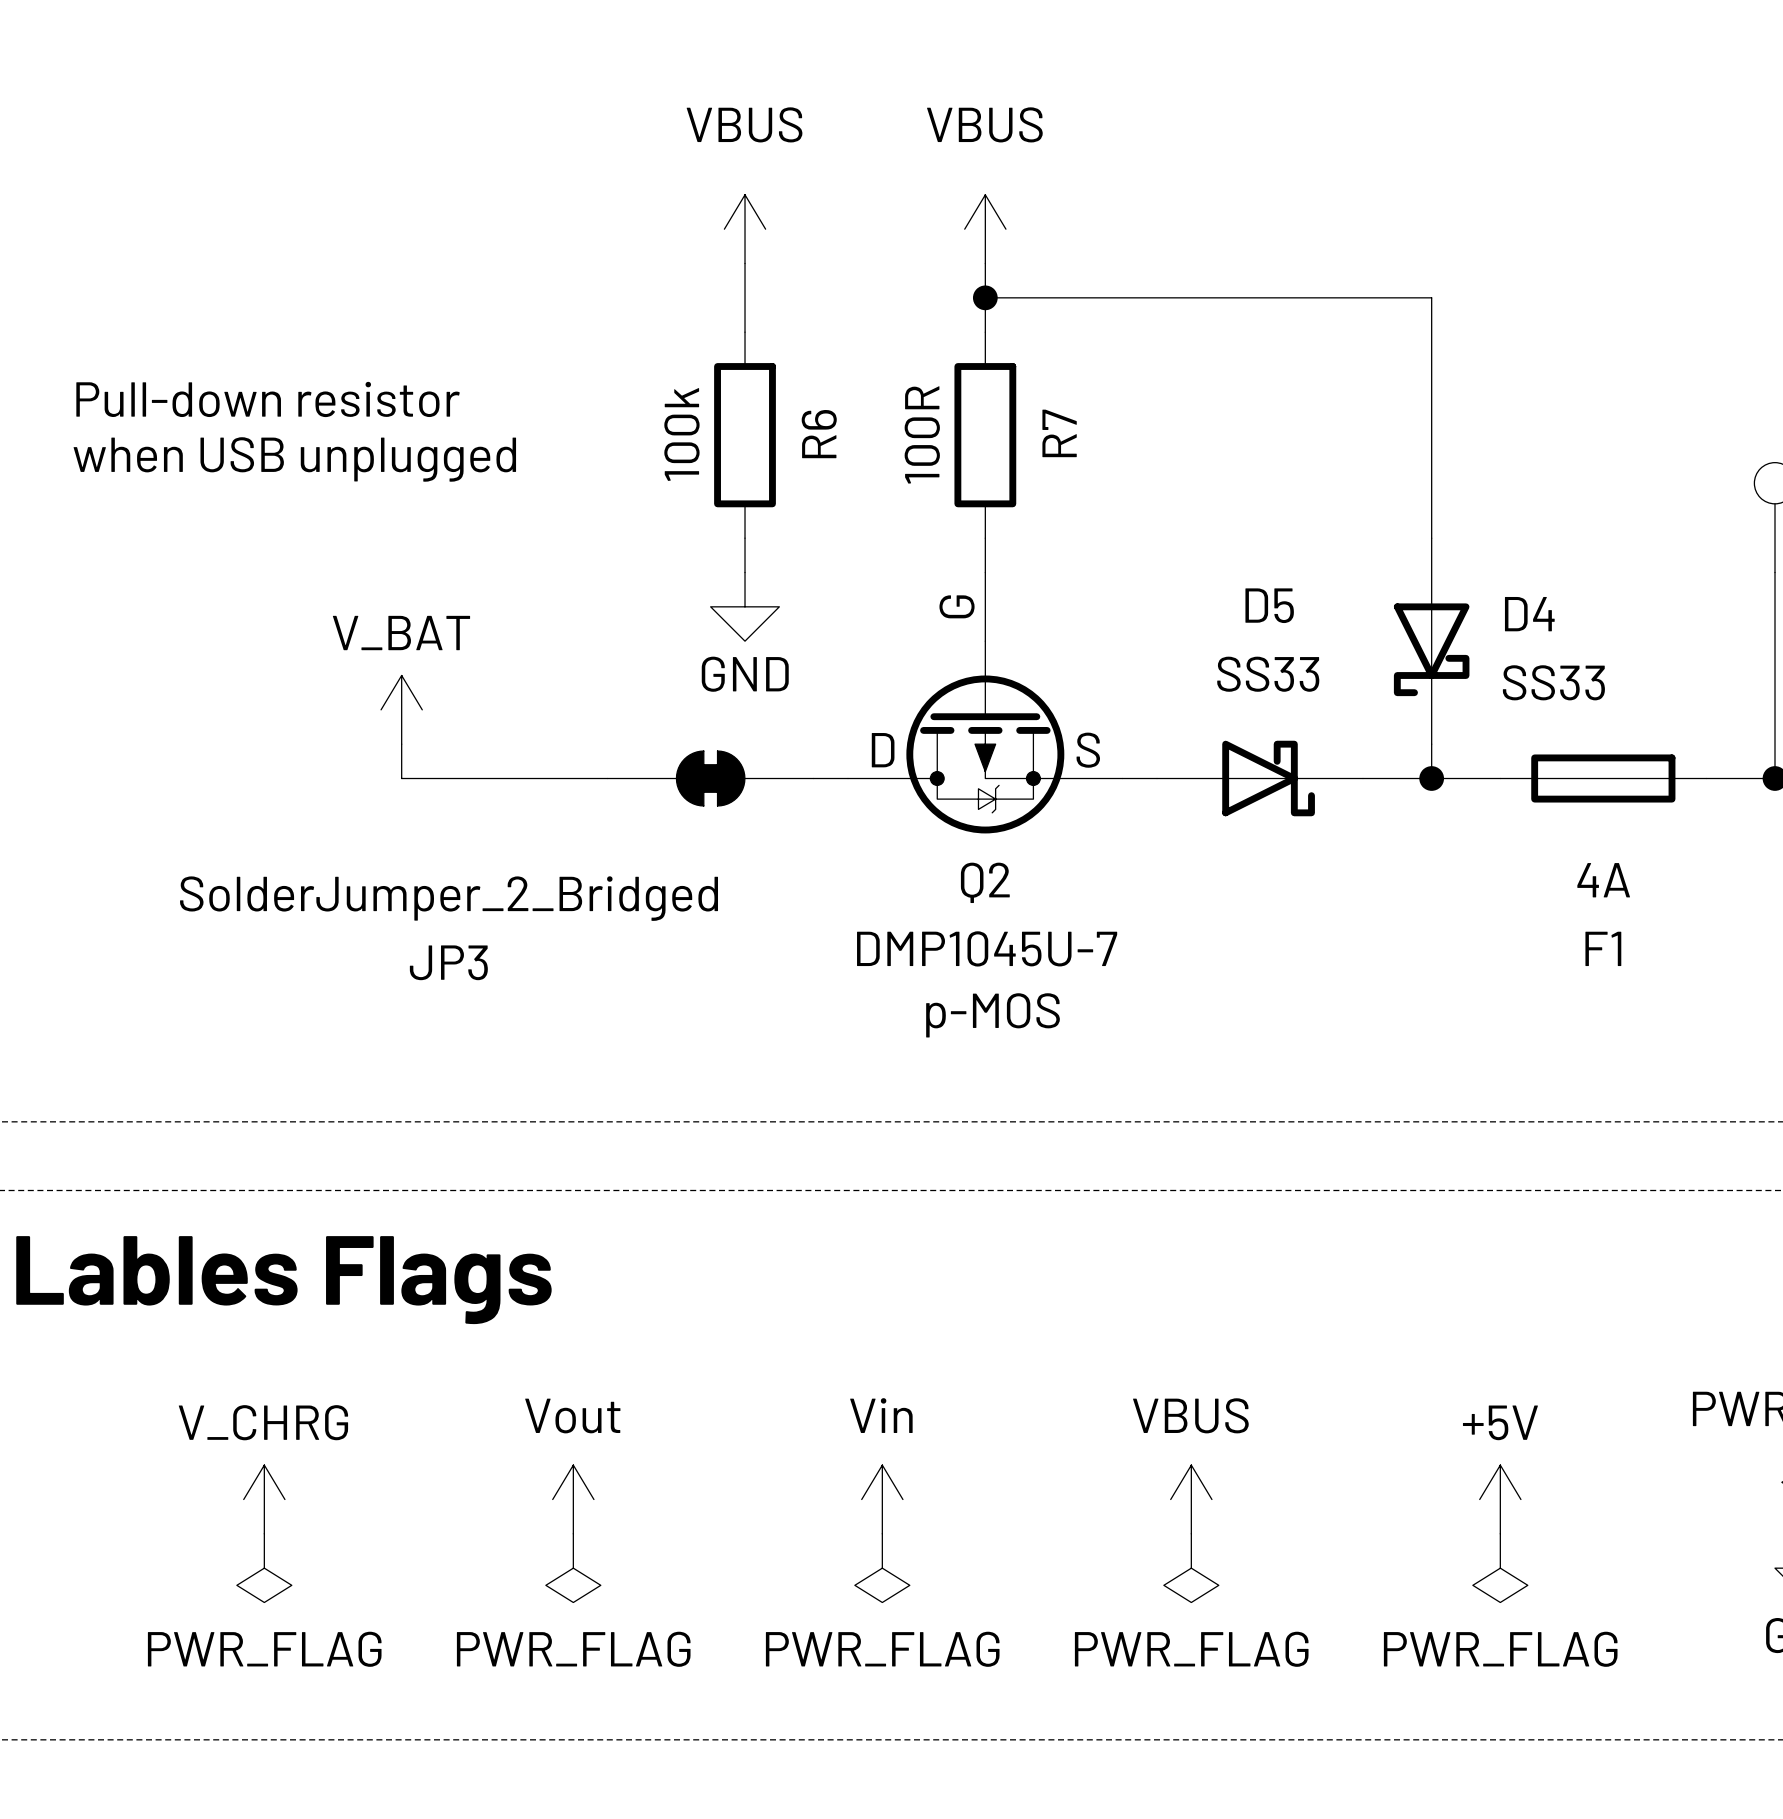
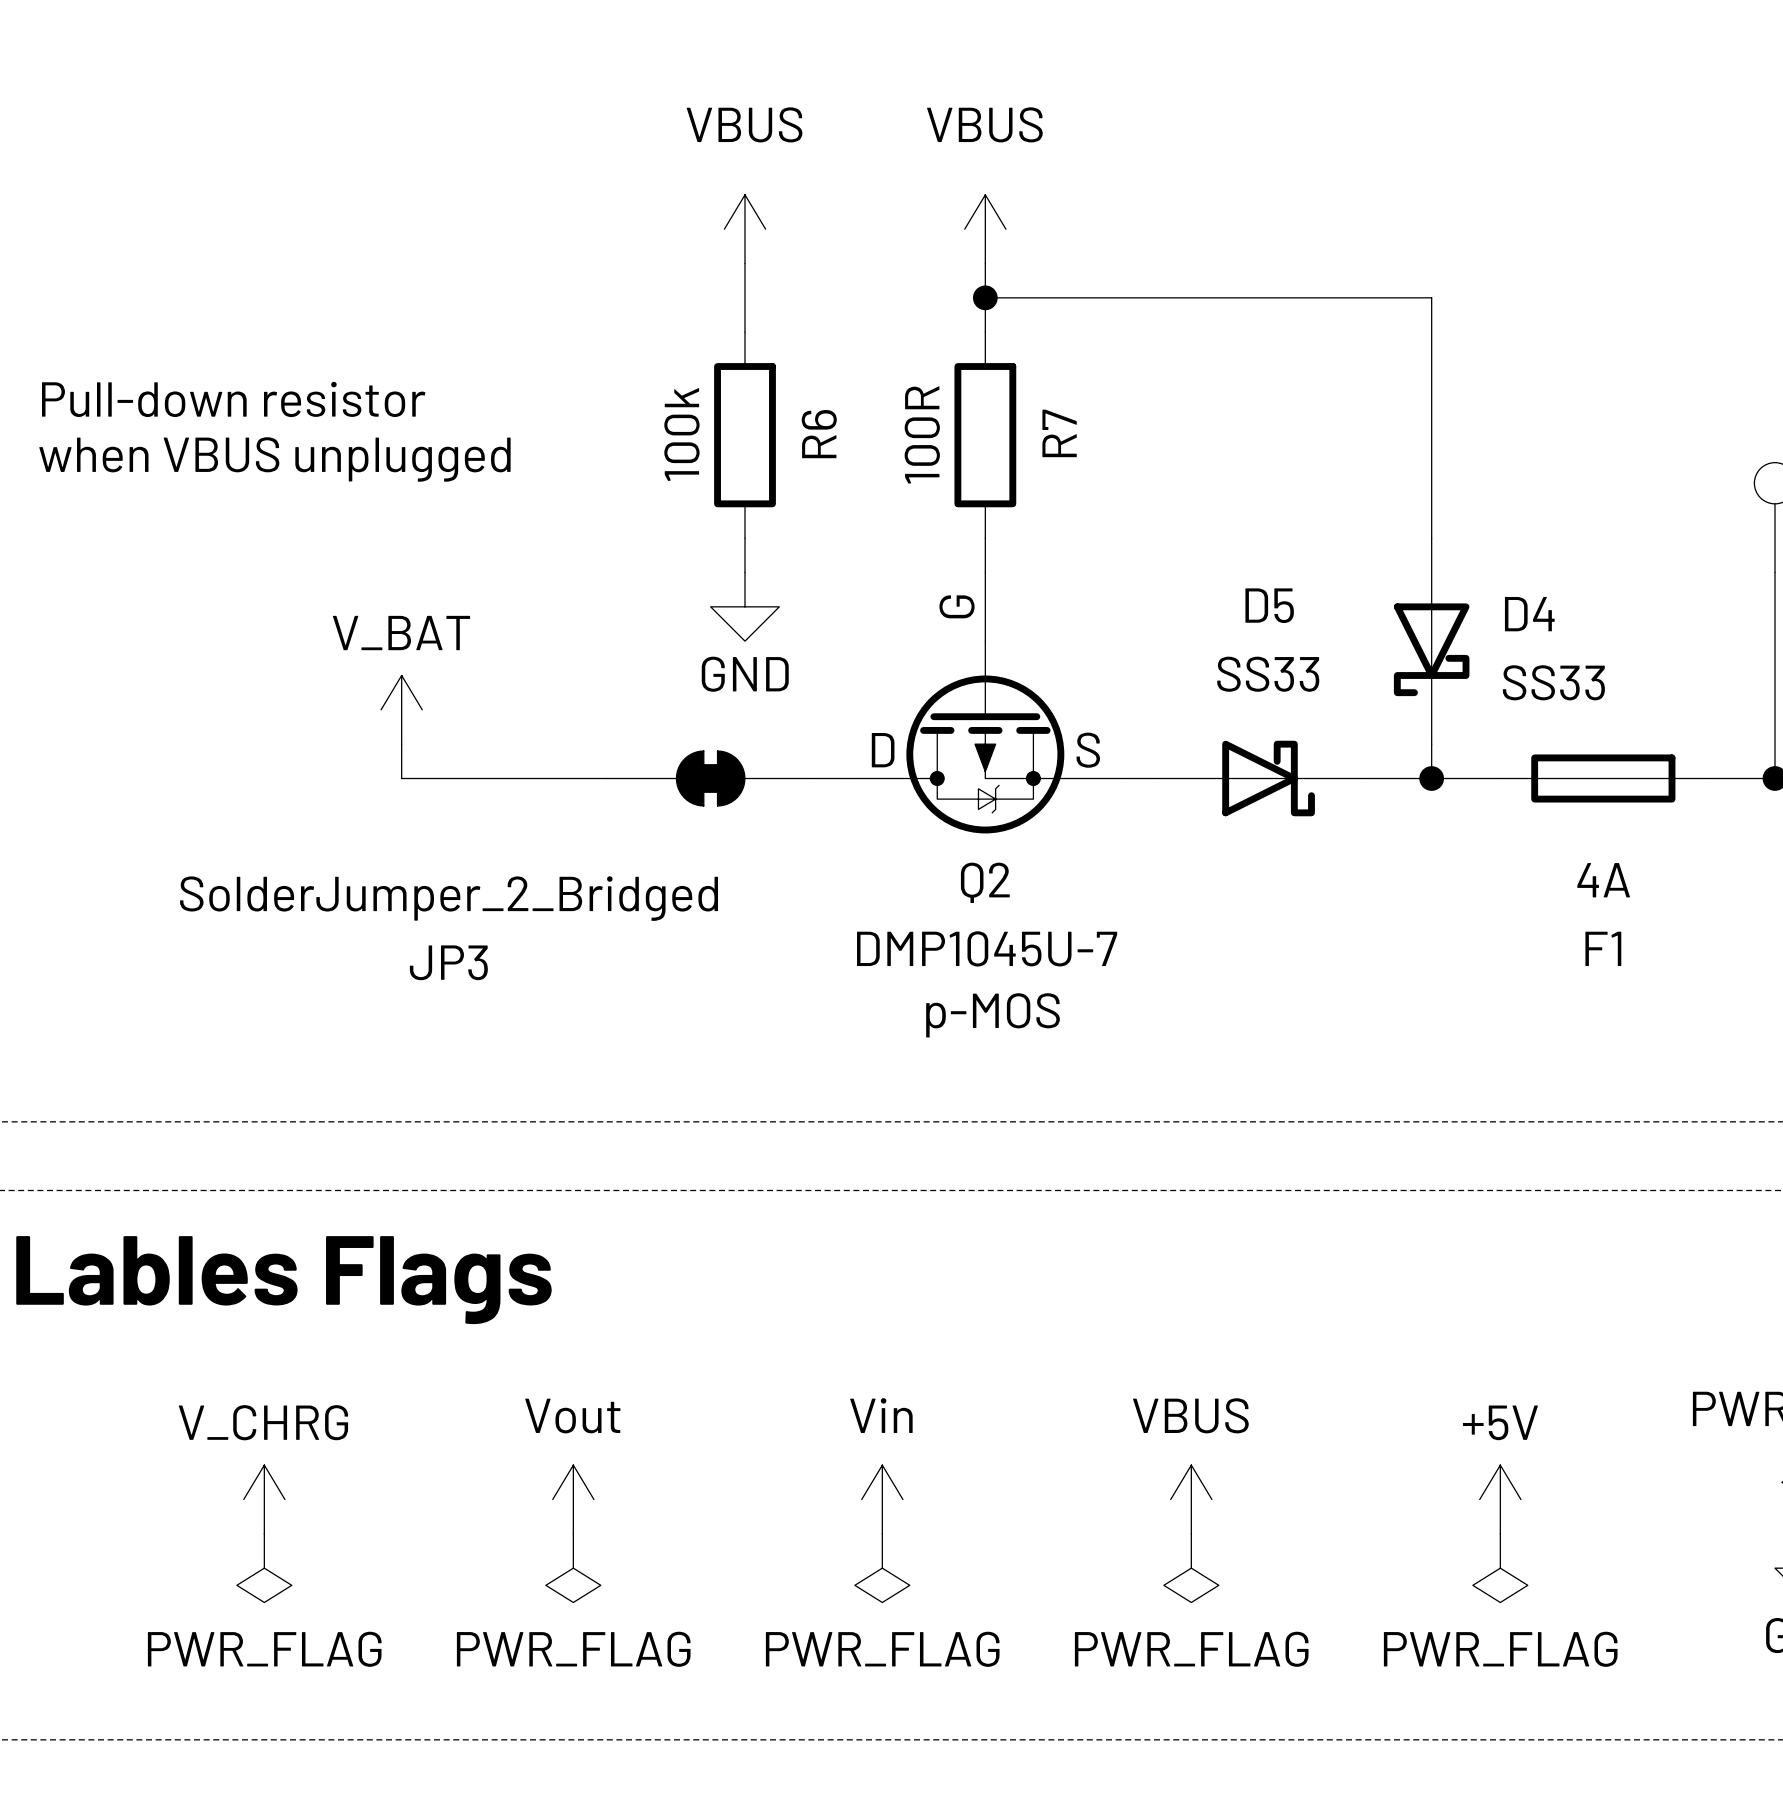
text position: Pull-down resistor (268, 399) -> Pull-down resistor (233, 399)
text: when USB unplugged (294, 459) -> when VBUS unplugged (274, 459)

